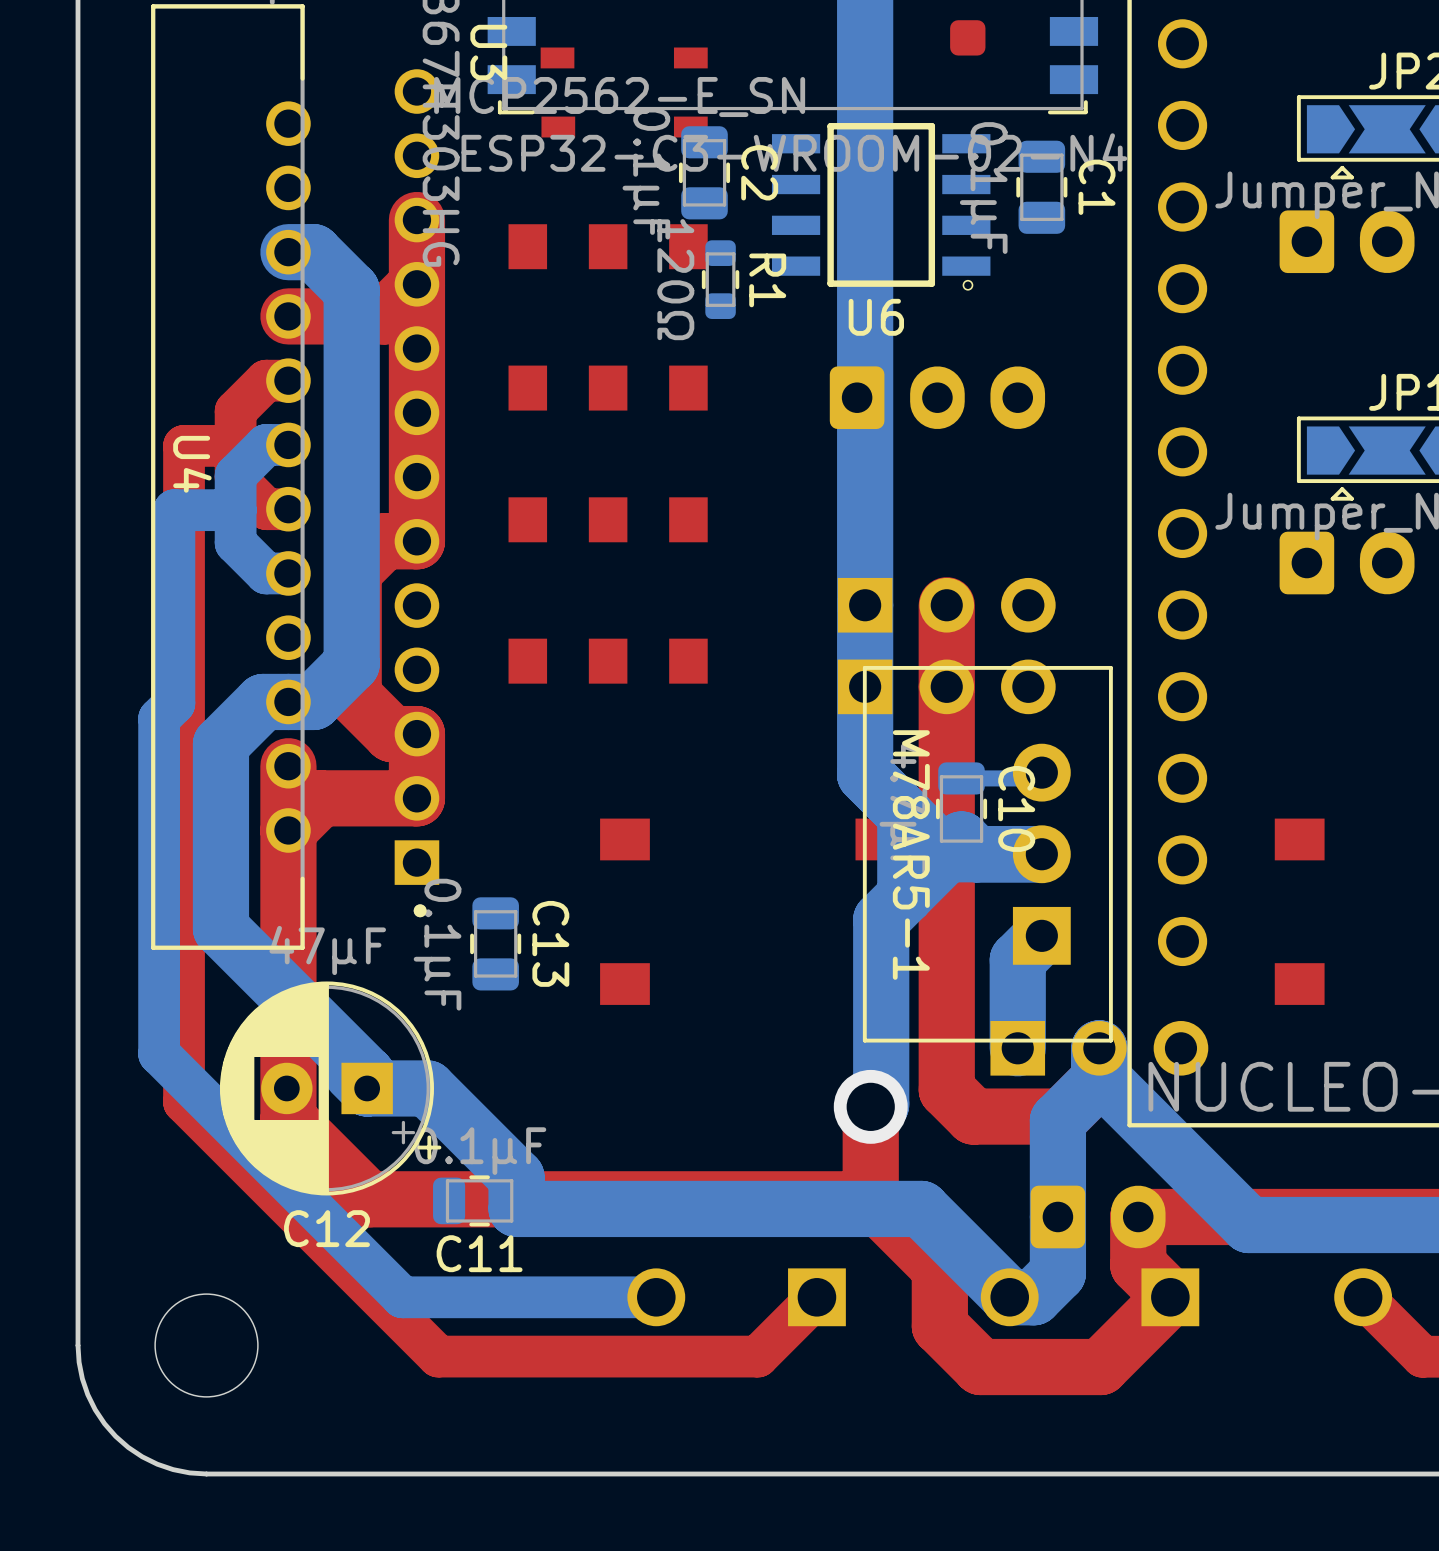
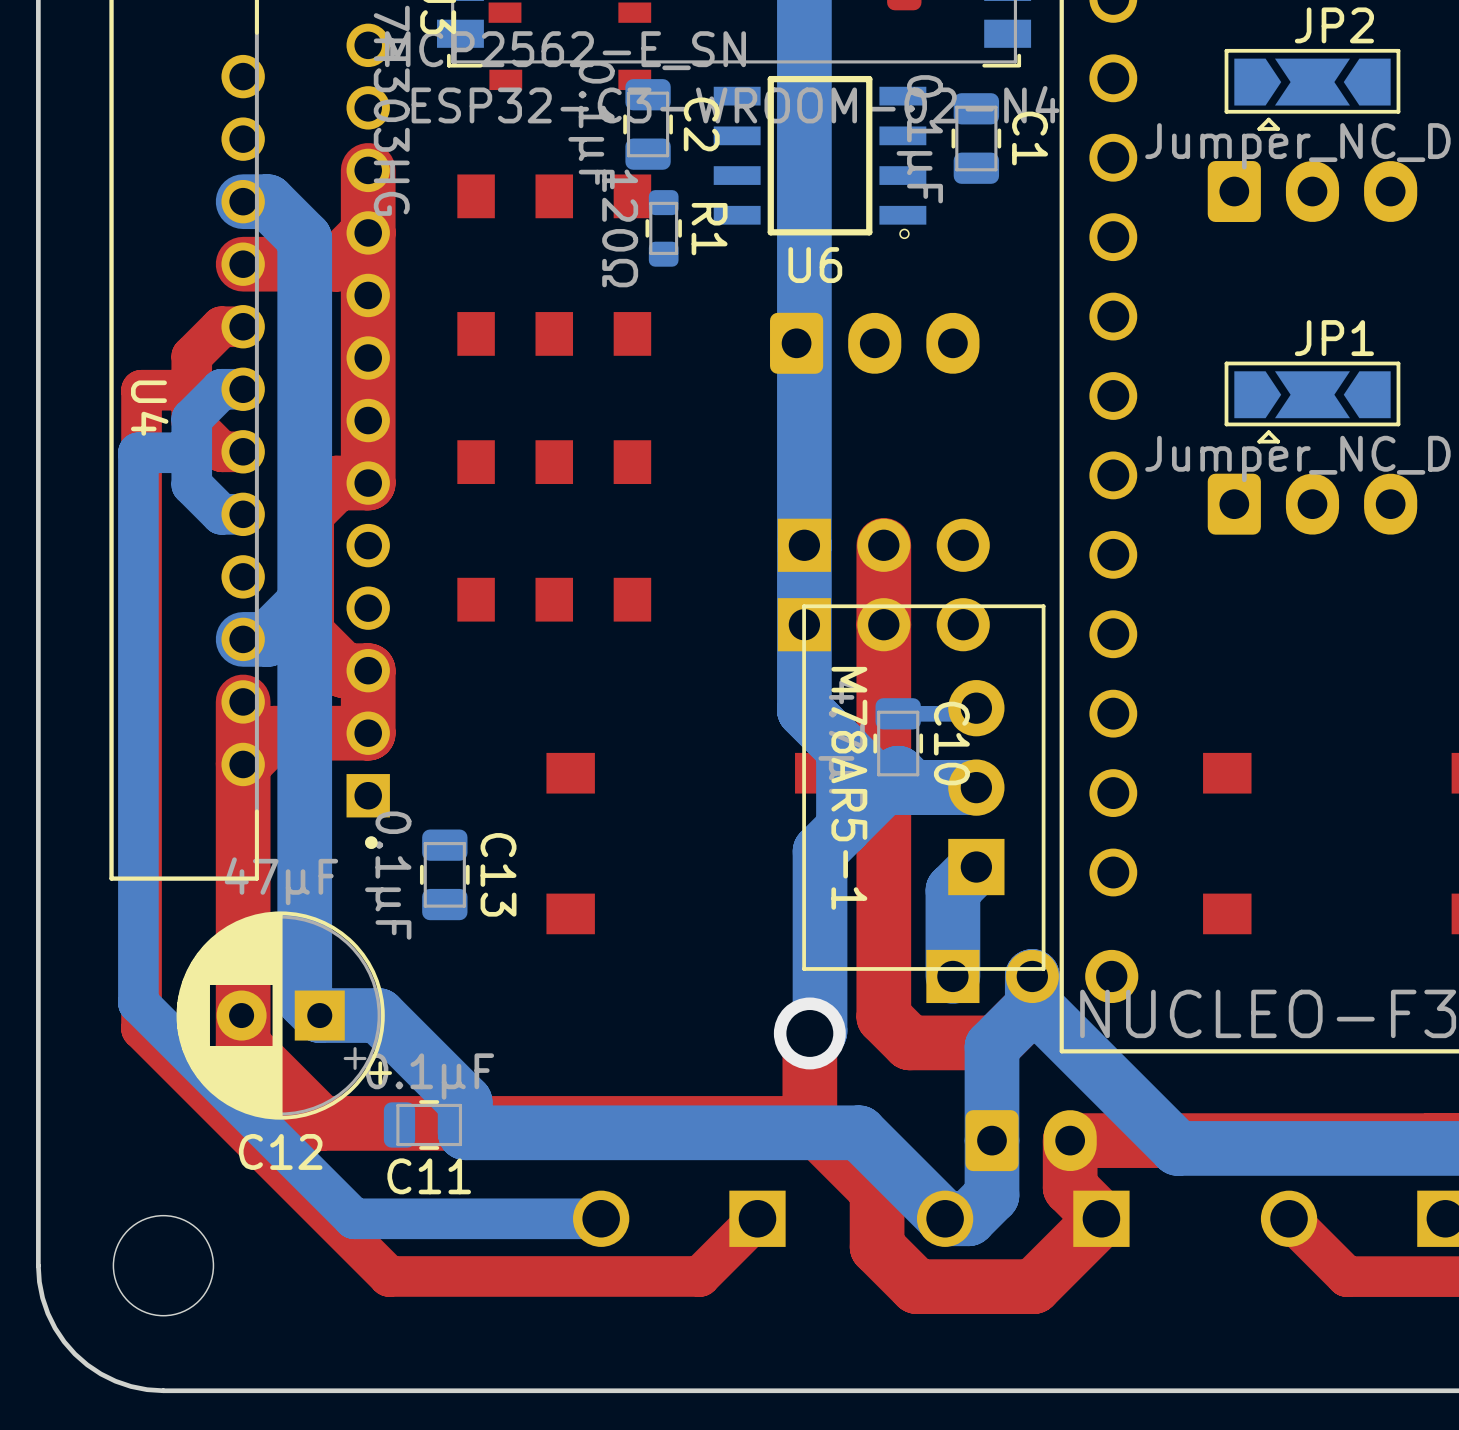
bottom track: (180, 510) (174, 510) (174, 703) (159, 718) (159, 1053) (180, 1075) -> (138, 452) (138, 1003)
bottom track: none -> (304, 602) (304, 1000)
bottom track: (288, 701) (263, 701) (220, 744) (220, 928) (367, 1074) (367, 1088) -> none

